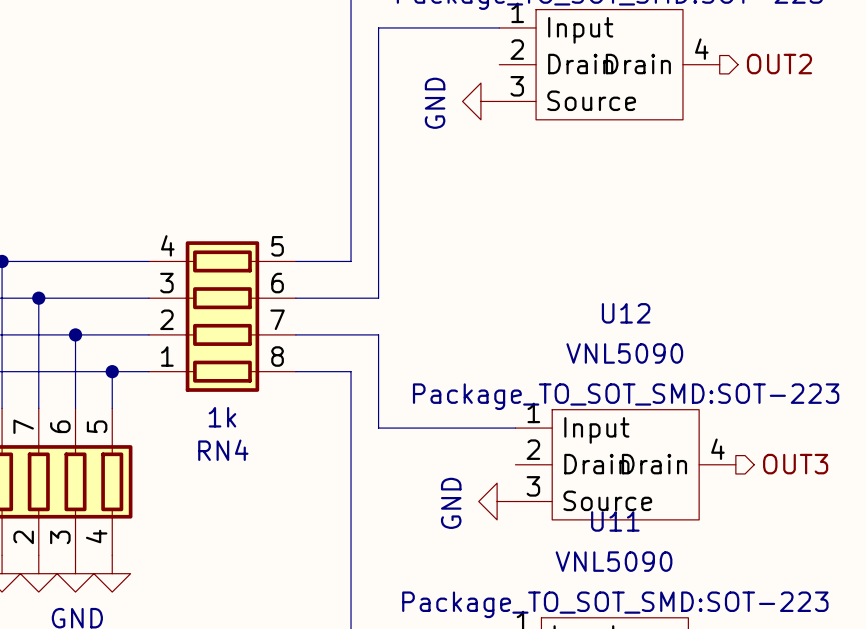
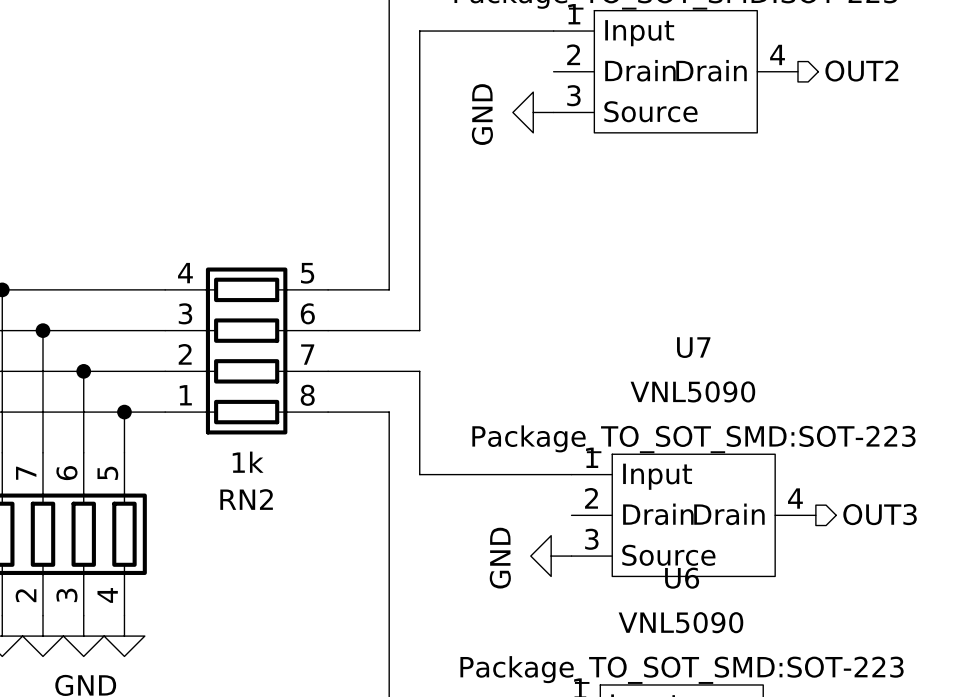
U12 name: U12 (626, 313) -> U7 (693, 347)
RN4 name: RN4 (223, 450) -> RN2 (246, 499)
U11 name: U11 (615, 521) -> U6 (682, 578)

